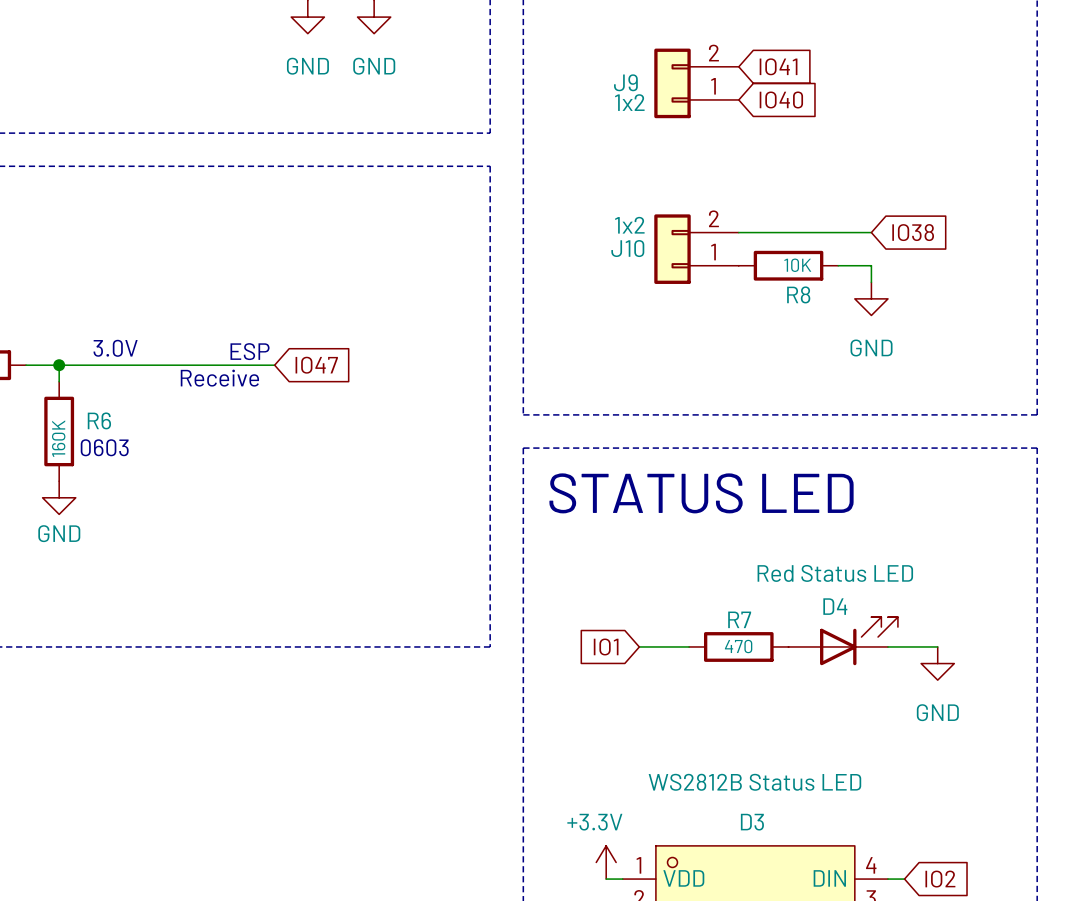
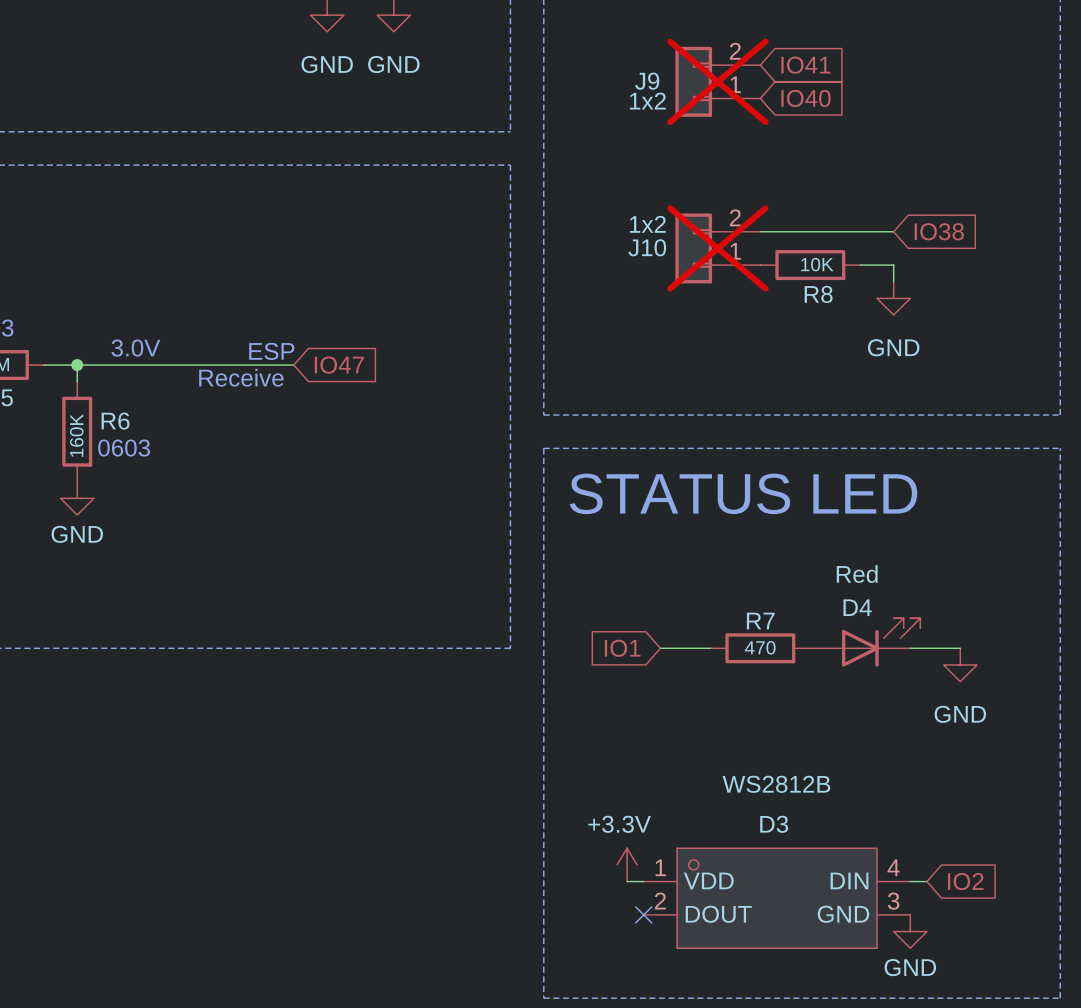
J9 do-not-place cross: none -> (717, 81)
J10 do-not-place cross: none -> (717, 248)
D4 value: Red Status LED (835, 573) -> Red (857, 574)
D3 value: WS2812B Status LED (754, 782) -> WS2812B (776, 784)

